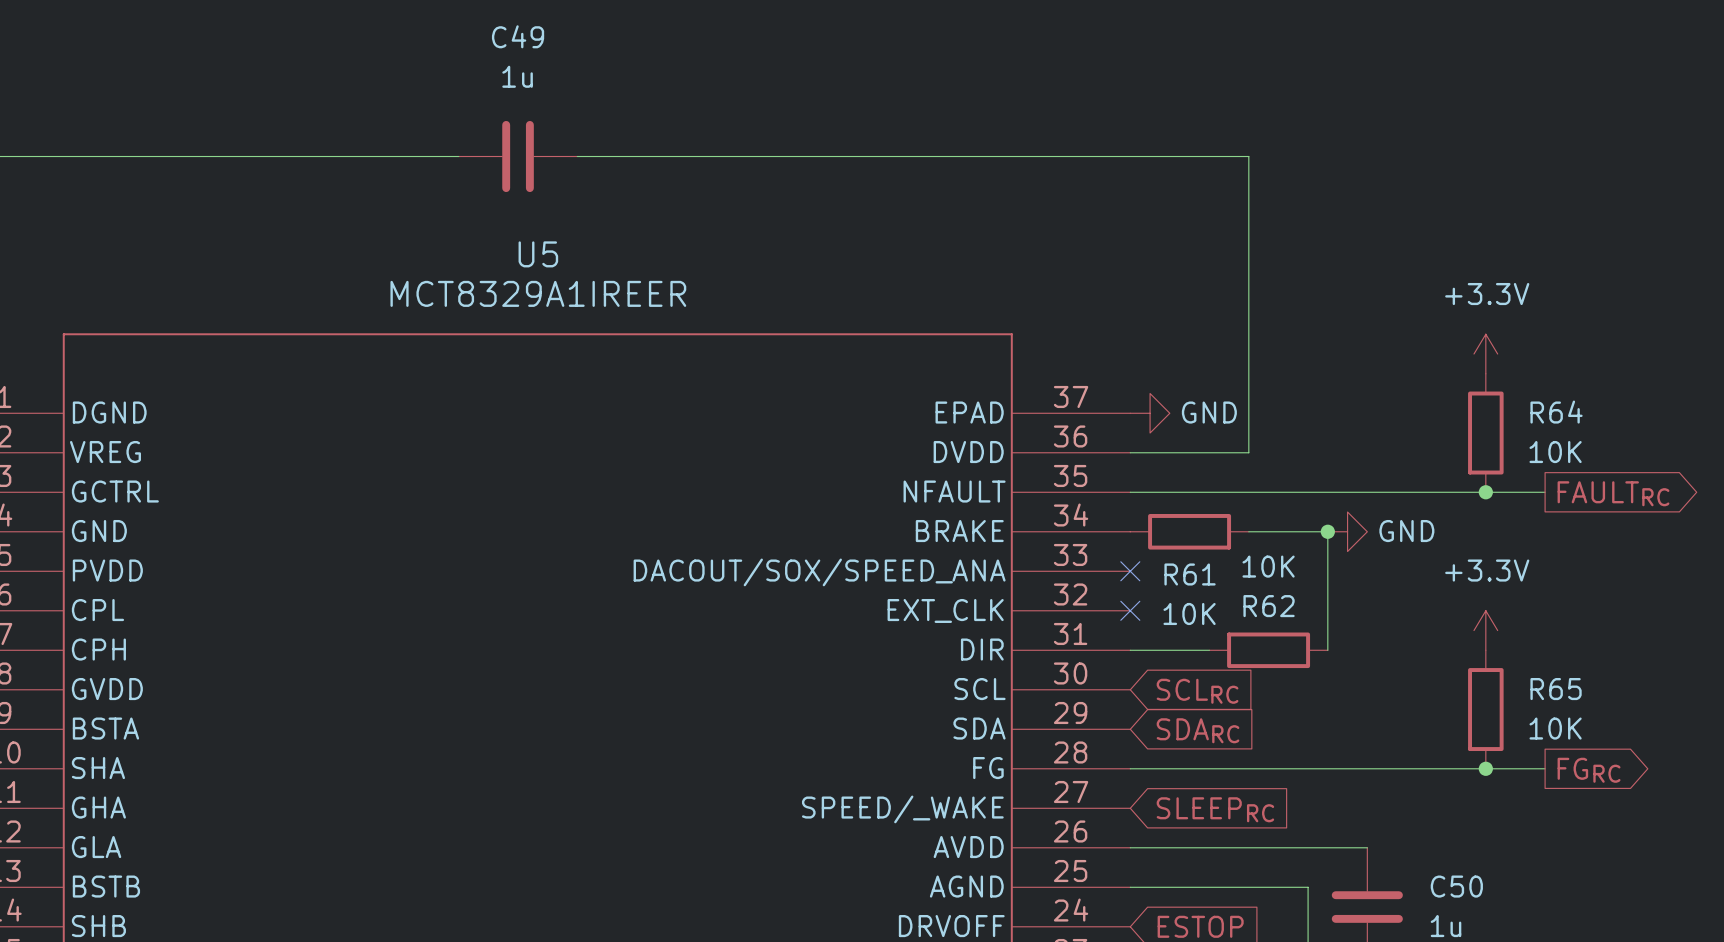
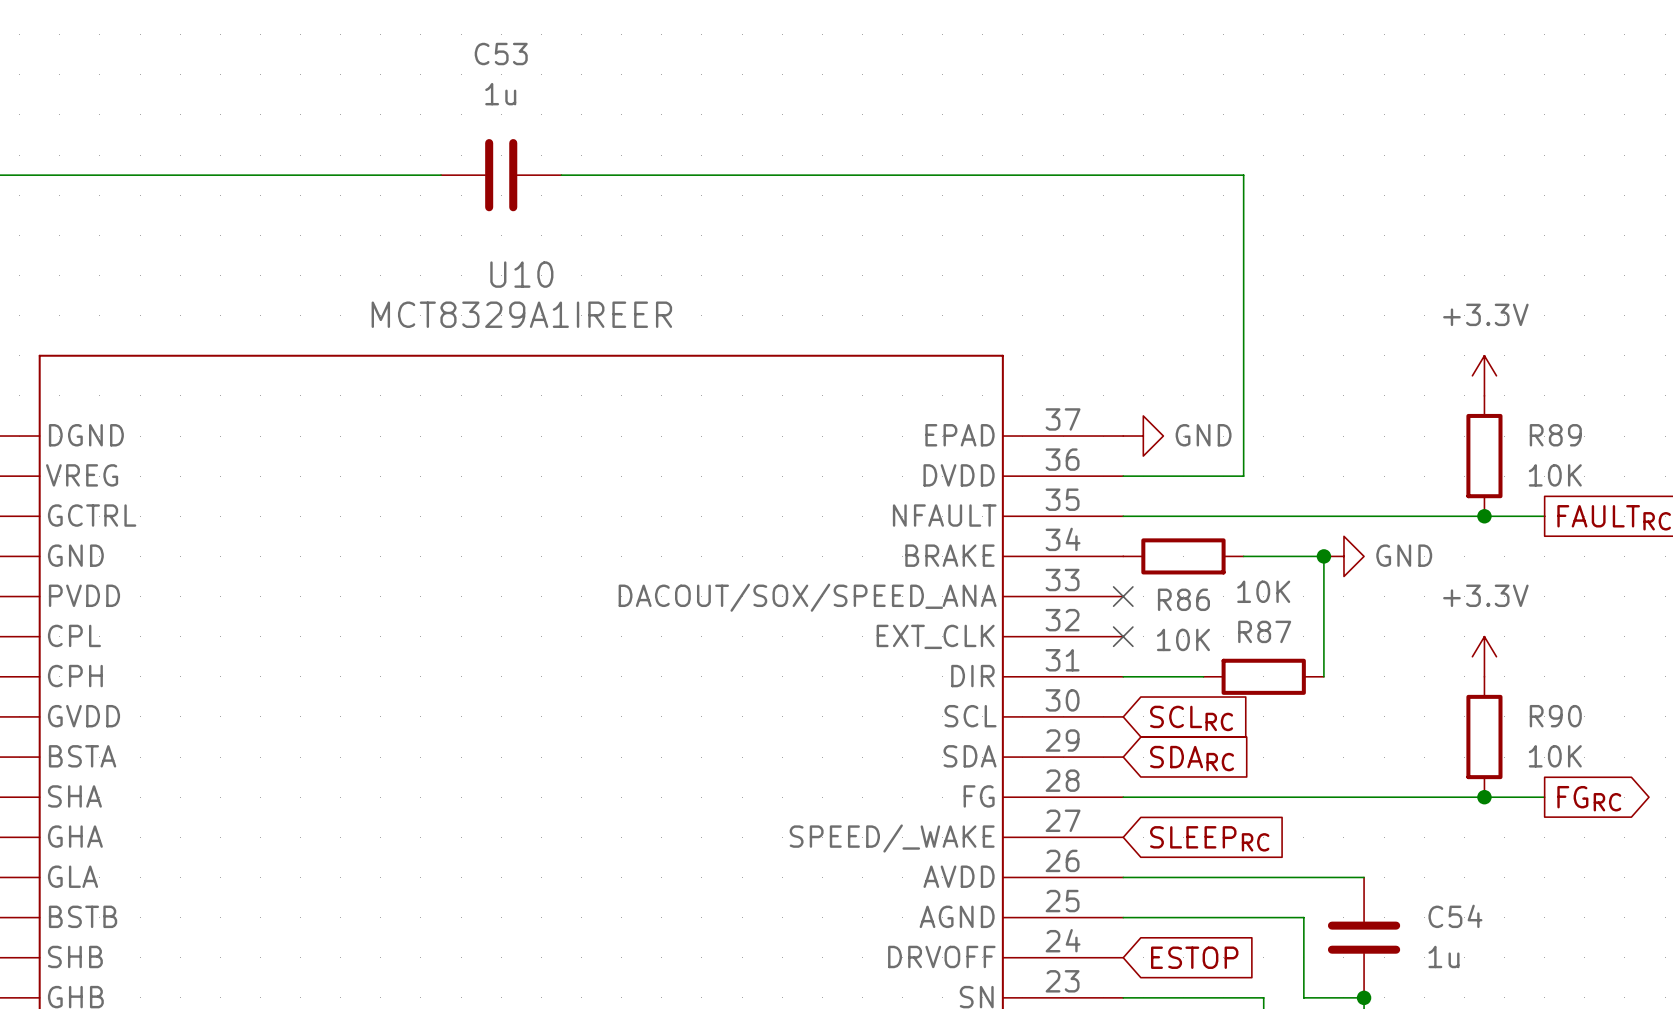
C49 name: C49 (518, 36) -> C53 (501, 54)
U5 name: U5 (538, 254) -> U10 (521, 274)
R64 name: R64 (1556, 412) -> R89 (1555, 435)
R61 name: R61 (1190, 574) -> R86 (1183, 599)
R62 name: R62 (1269, 606) -> R87 (1264, 631)
R65 name: R65 (1556, 689) -> R90 (1555, 716)
C50 name: C50 (1456, 886) -> C54 (1455, 916)

